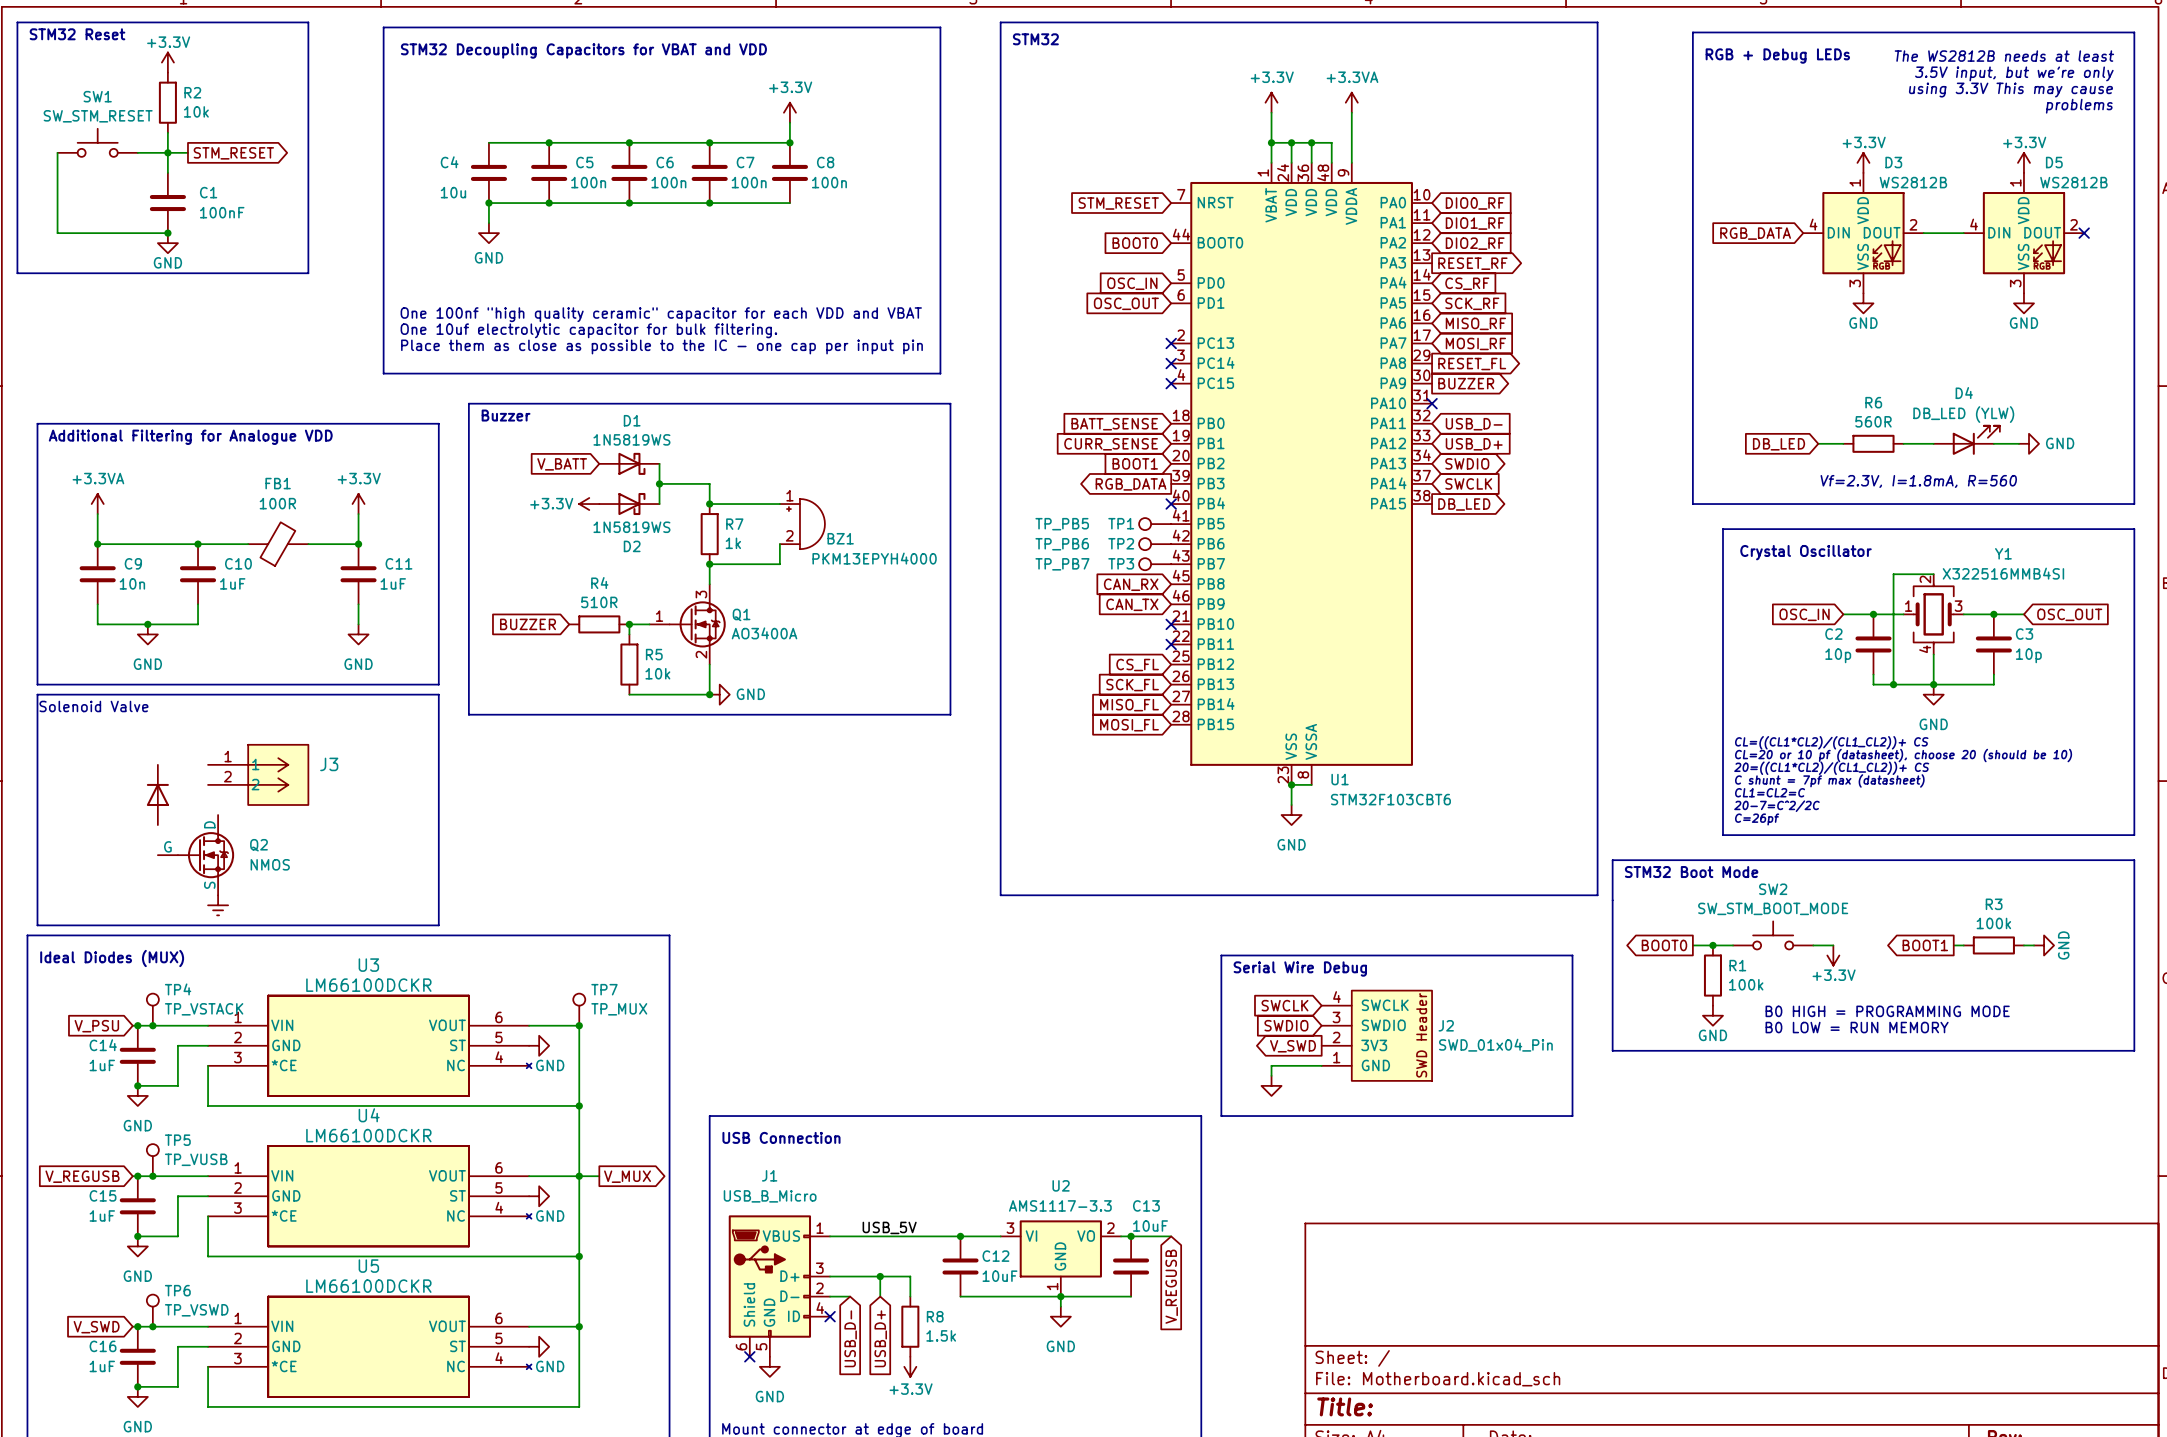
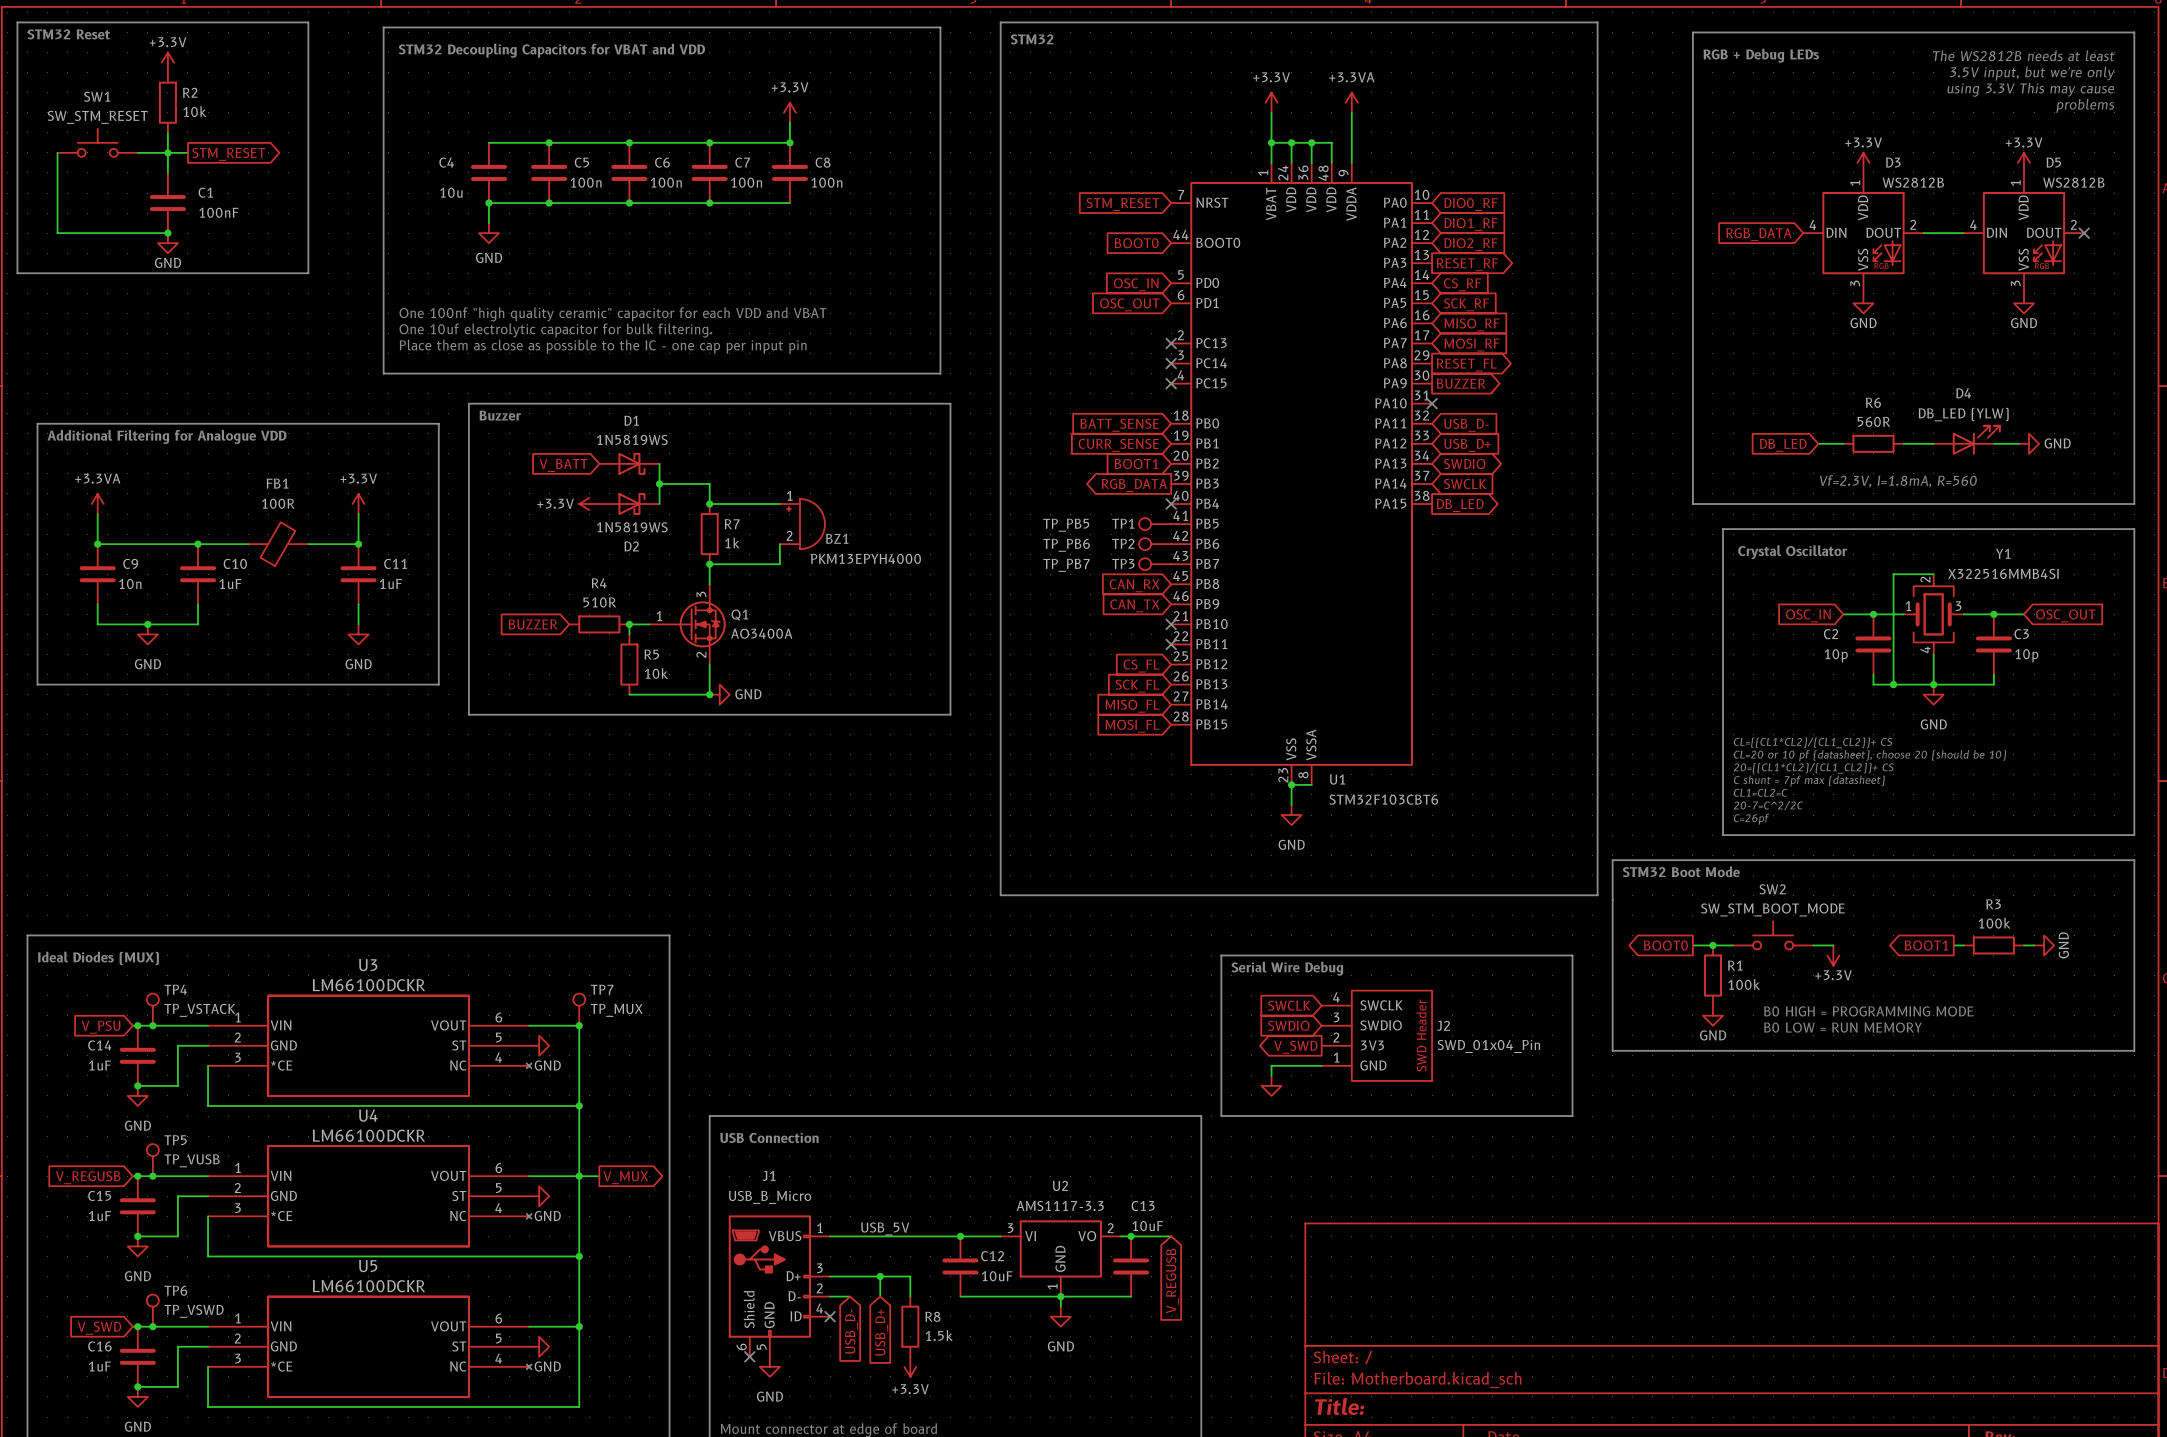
line: (37, 694) (438, 694) (438, 925) (37, 925) (37, 694) -> none
text: Solenoid Valve (93, 706) -> none
J3: (258, 774) -> none
part: (157, 794) -> none
Q2: NMOS (196, 855) -> none
power symbol: (218, 905) -> none

